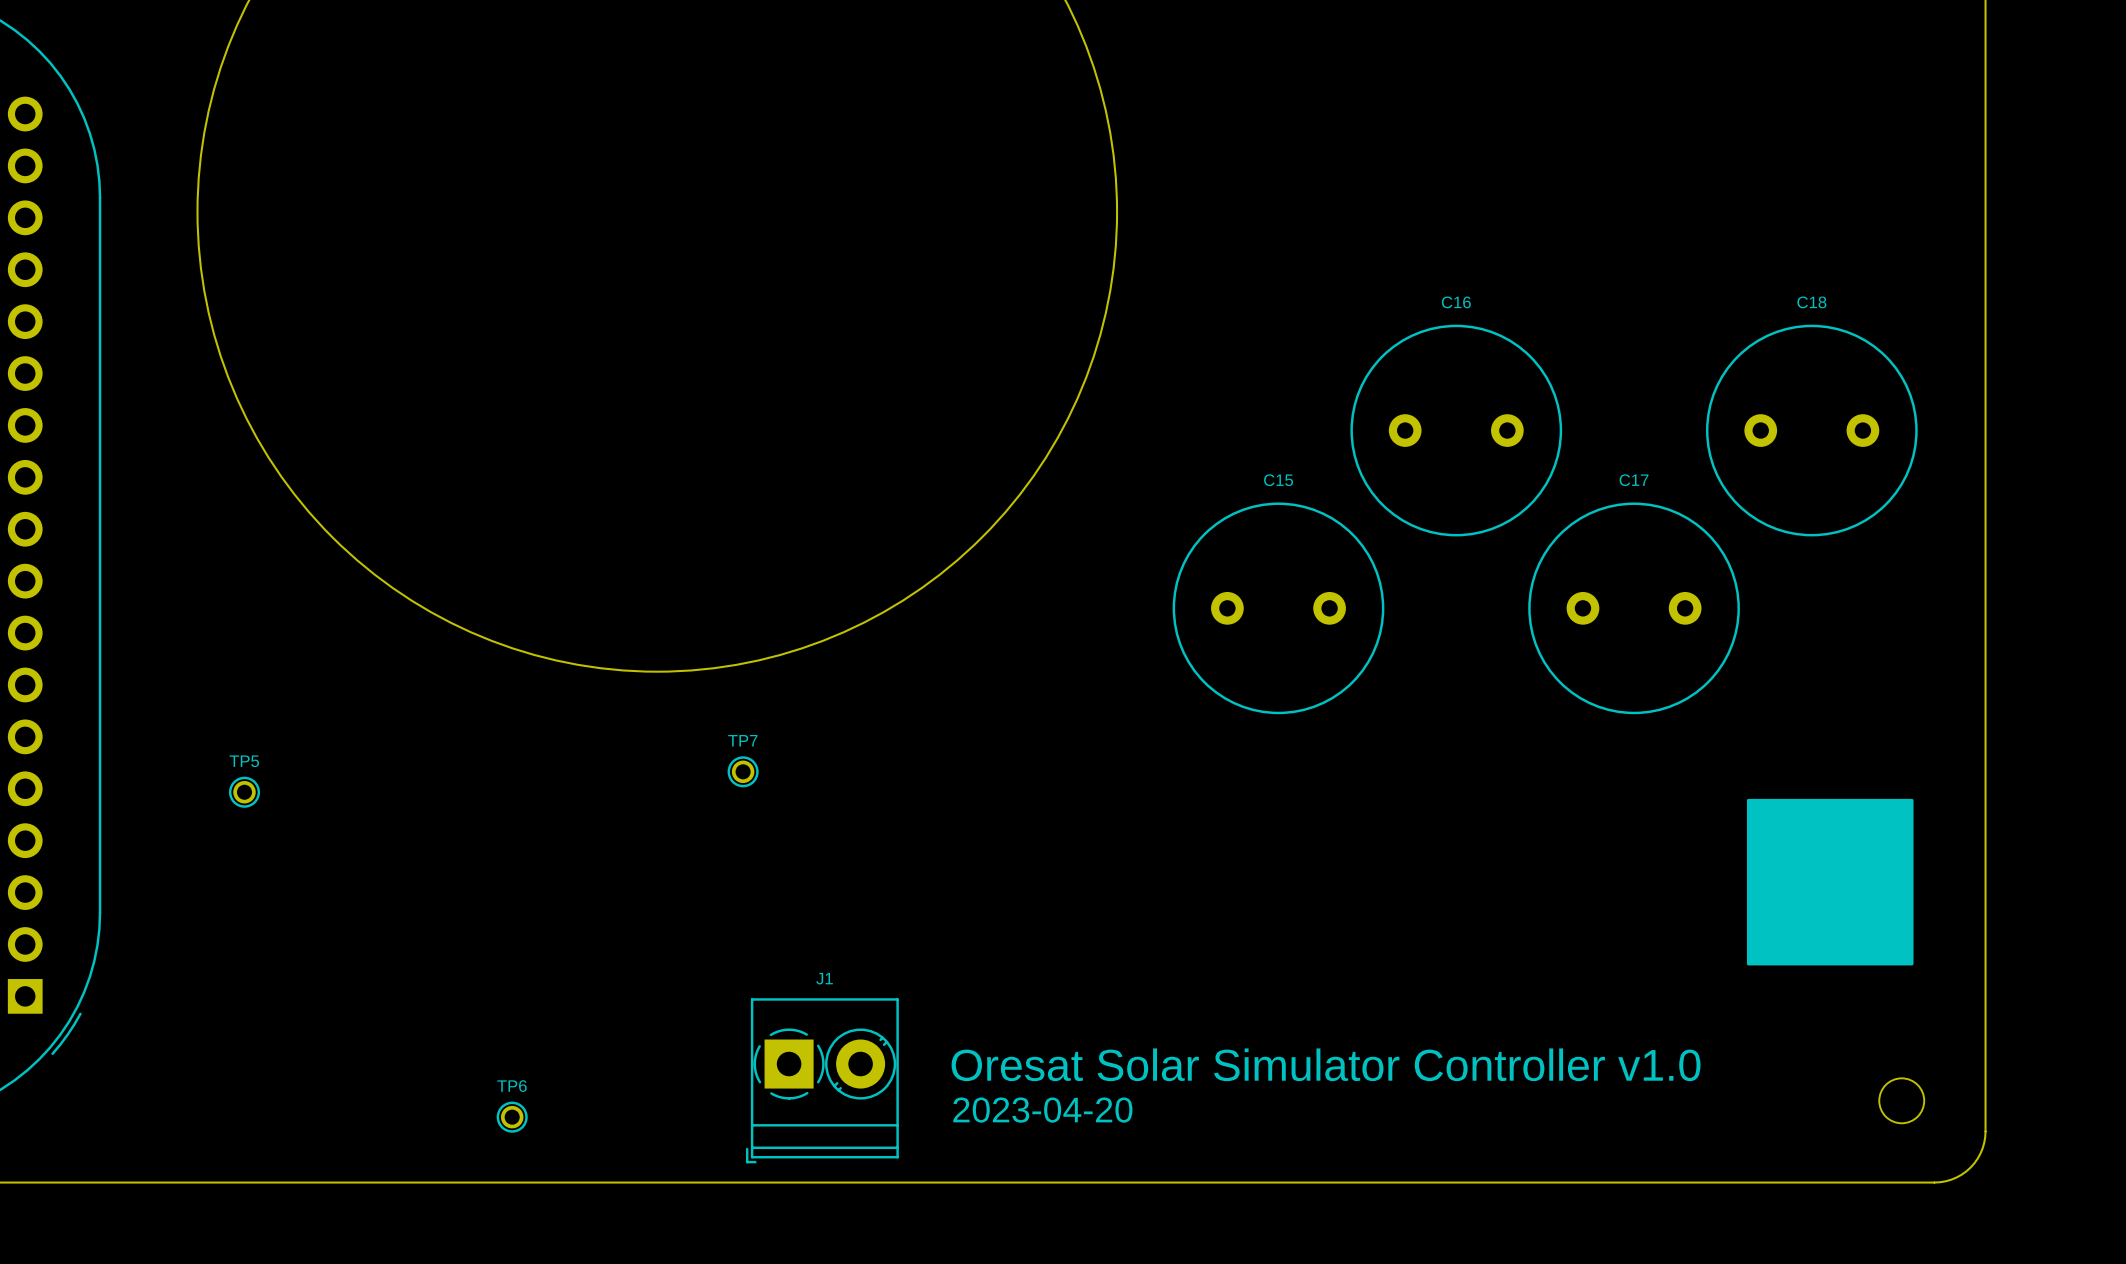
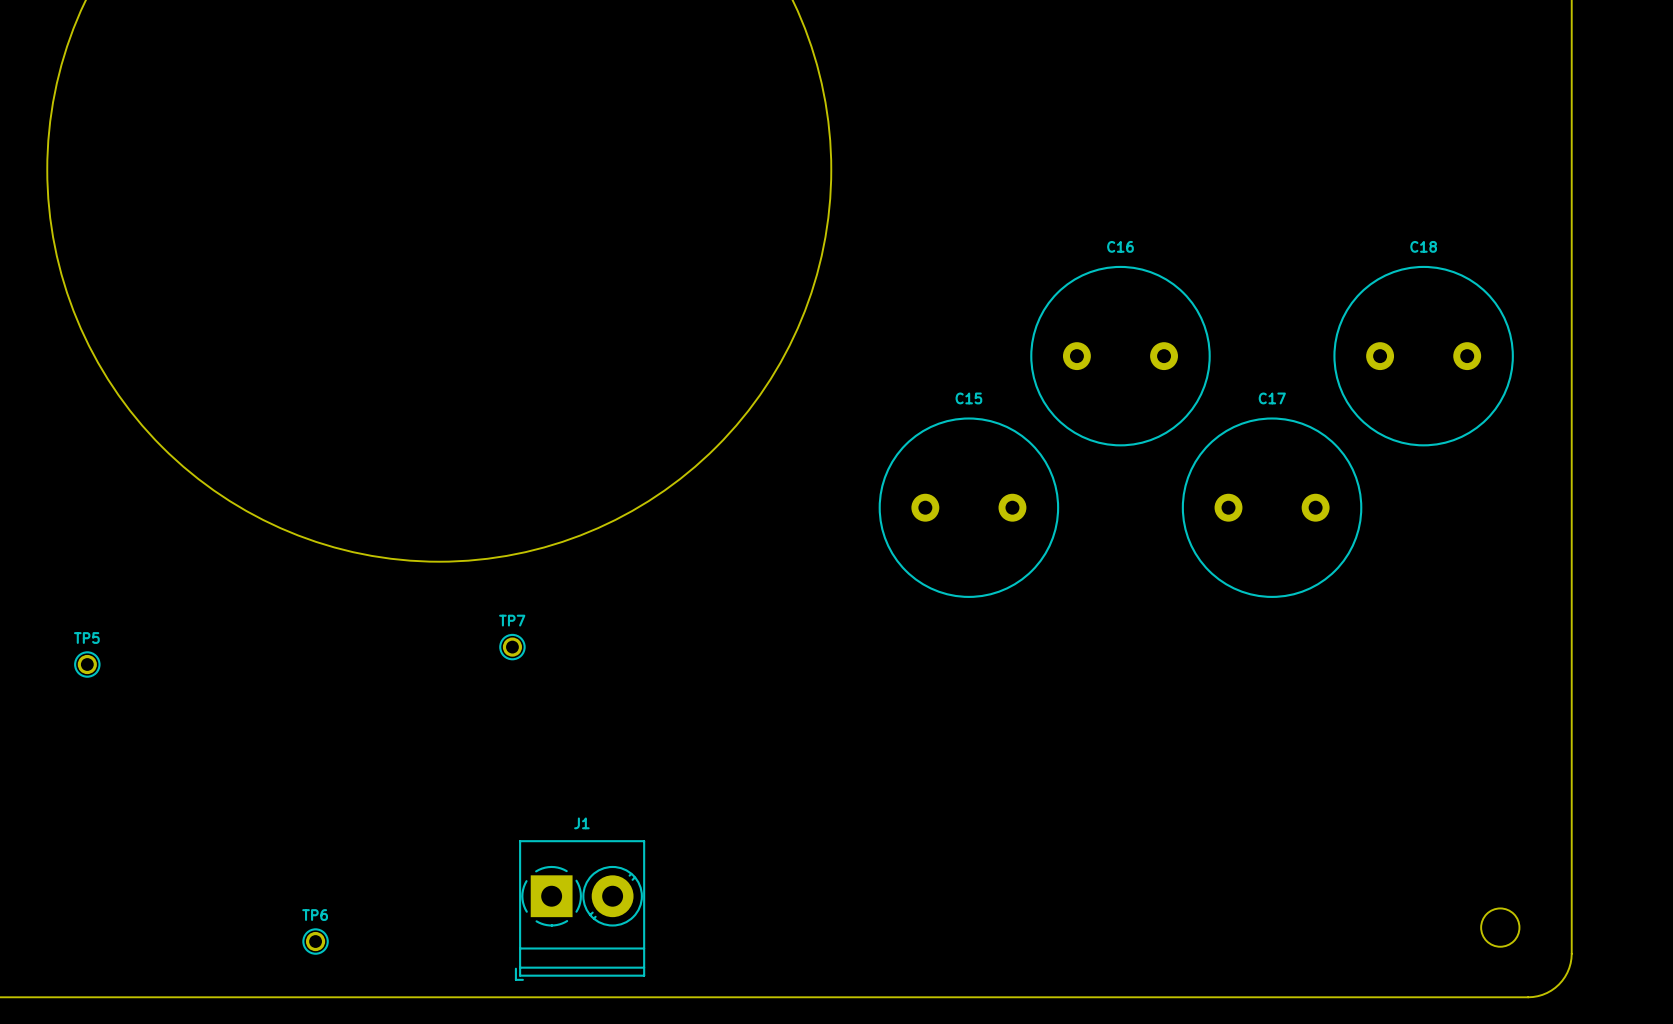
drawing: [1746, 798, 1914, 966] -> none
text: Oresat Solar Simulator Controller v1.0 (1326, 1064) -> none
text: 2023-04-20 (1042, 1110) -> none

